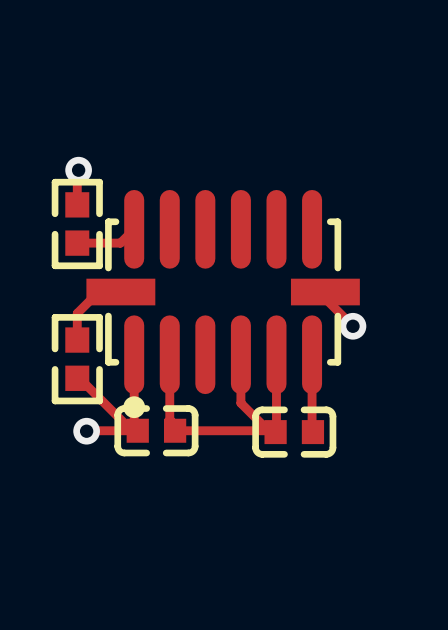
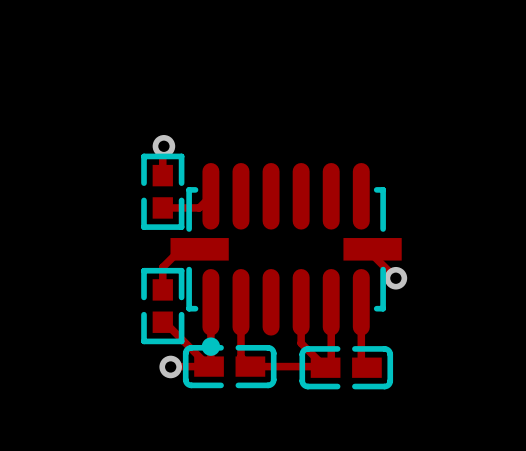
part footprint: [114, 405, 199, 457] -> [182, 344, 277, 389]
part footprint: [252, 406, 337, 458] -> [299, 346, 394, 390]

